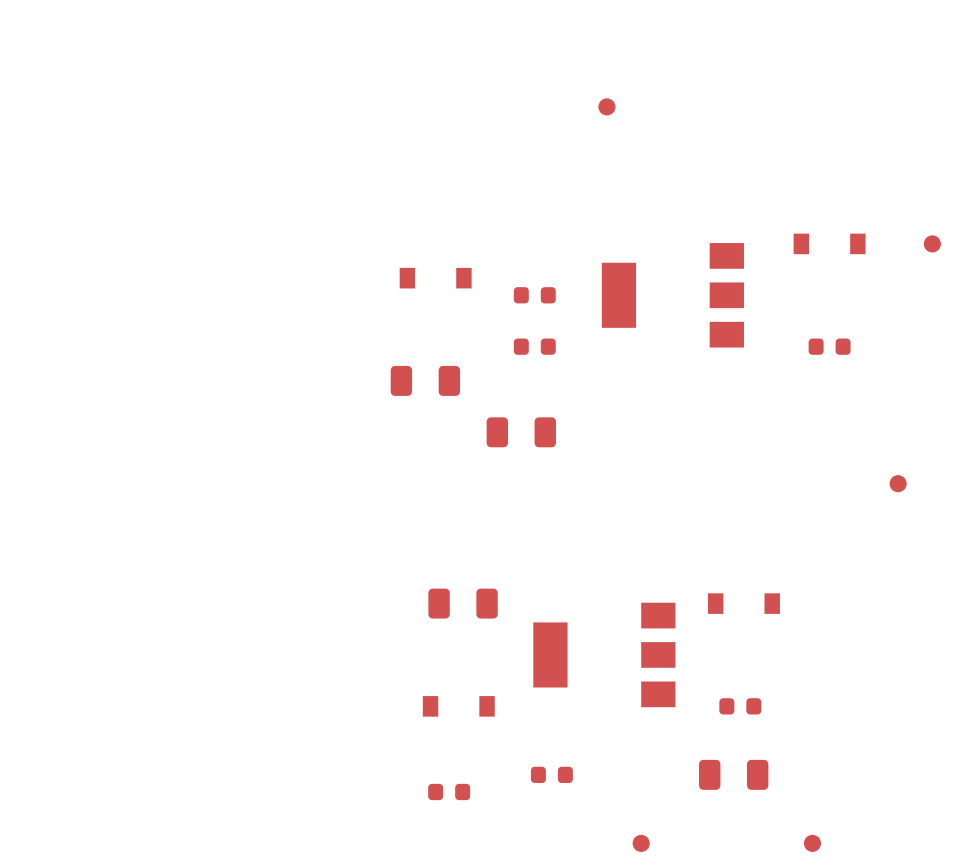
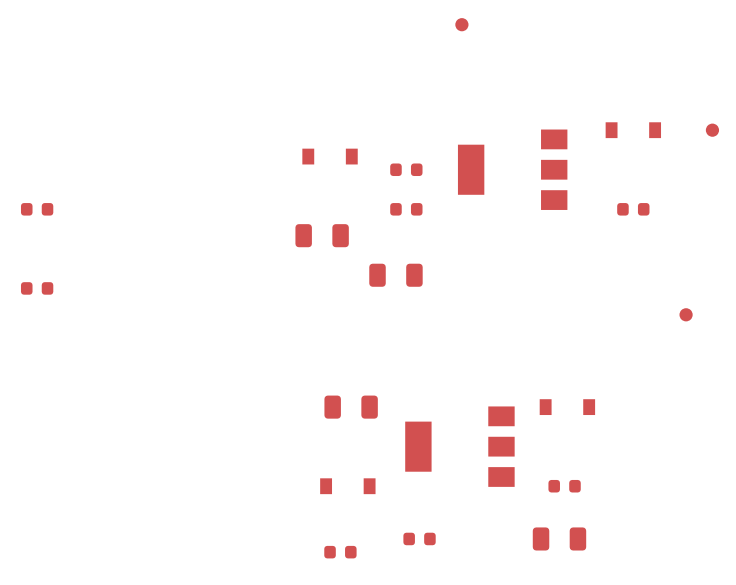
part: none -> (37, 209)
part: none -> (37, 288)

